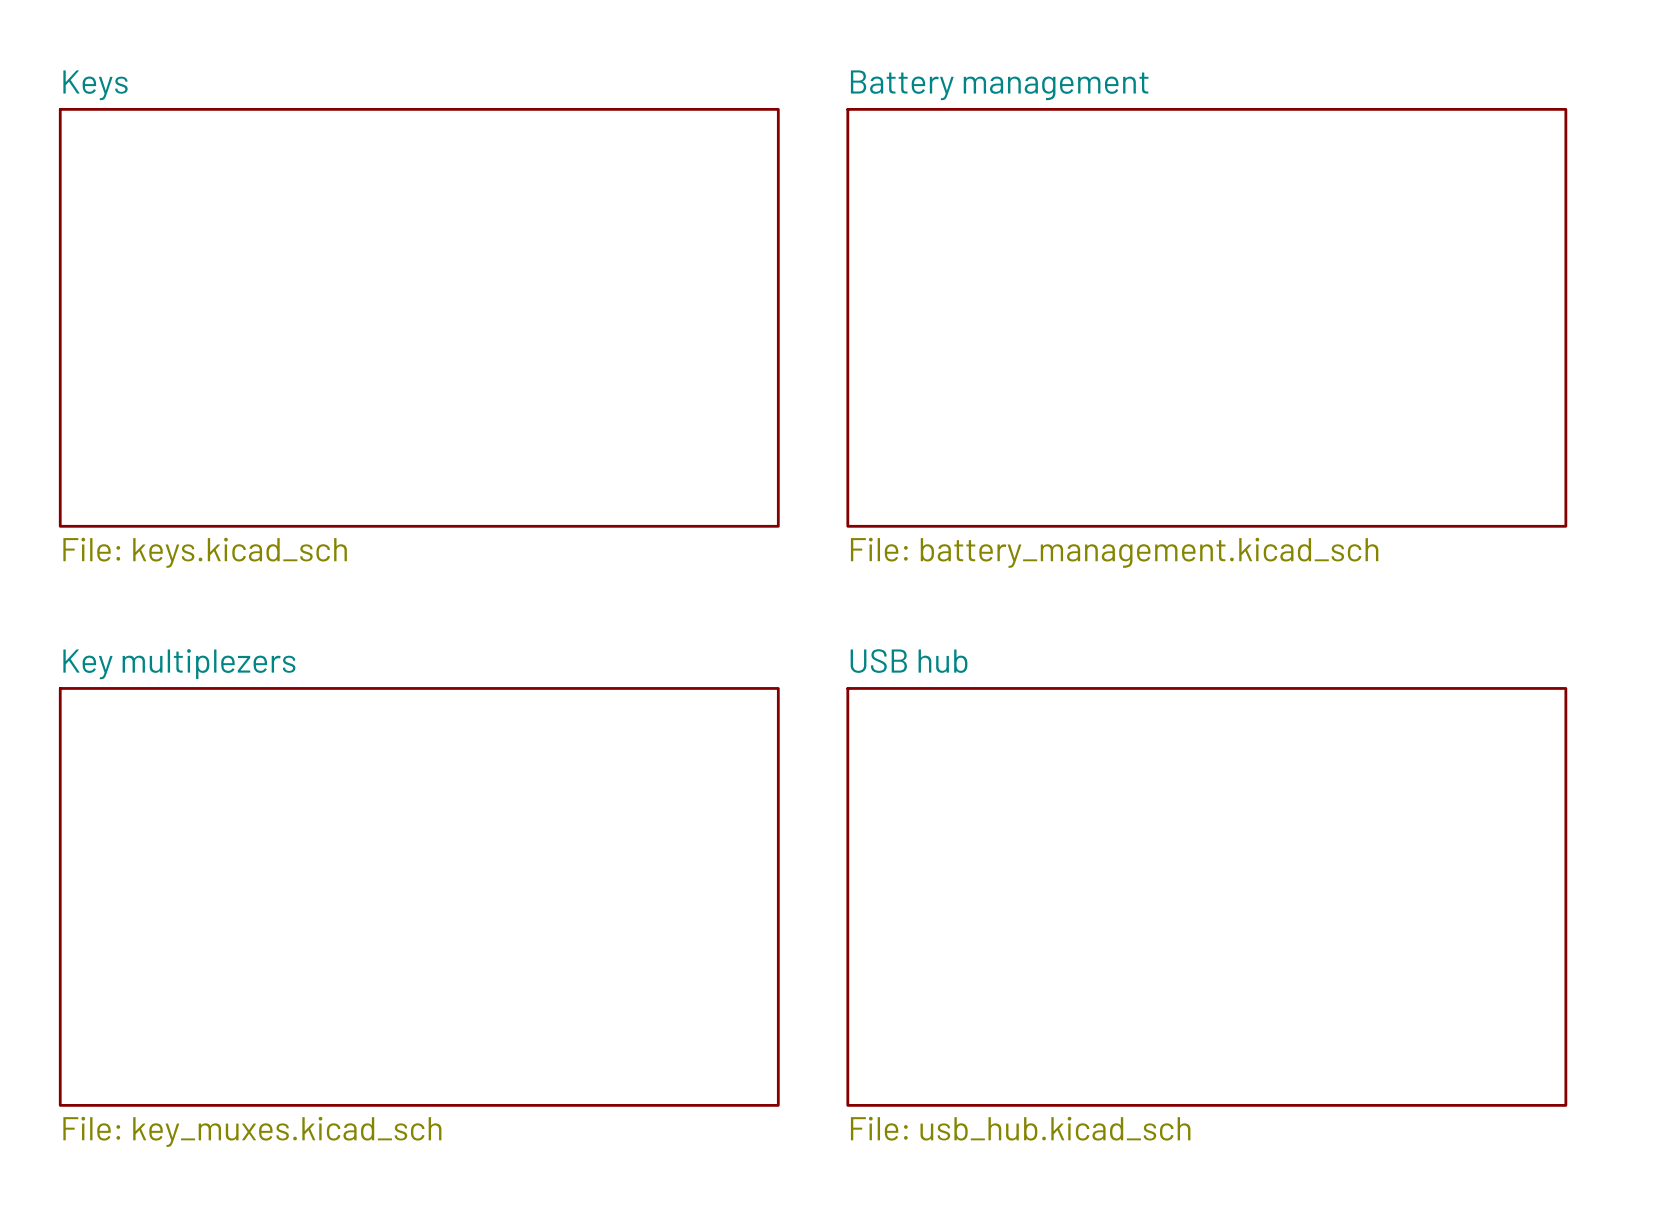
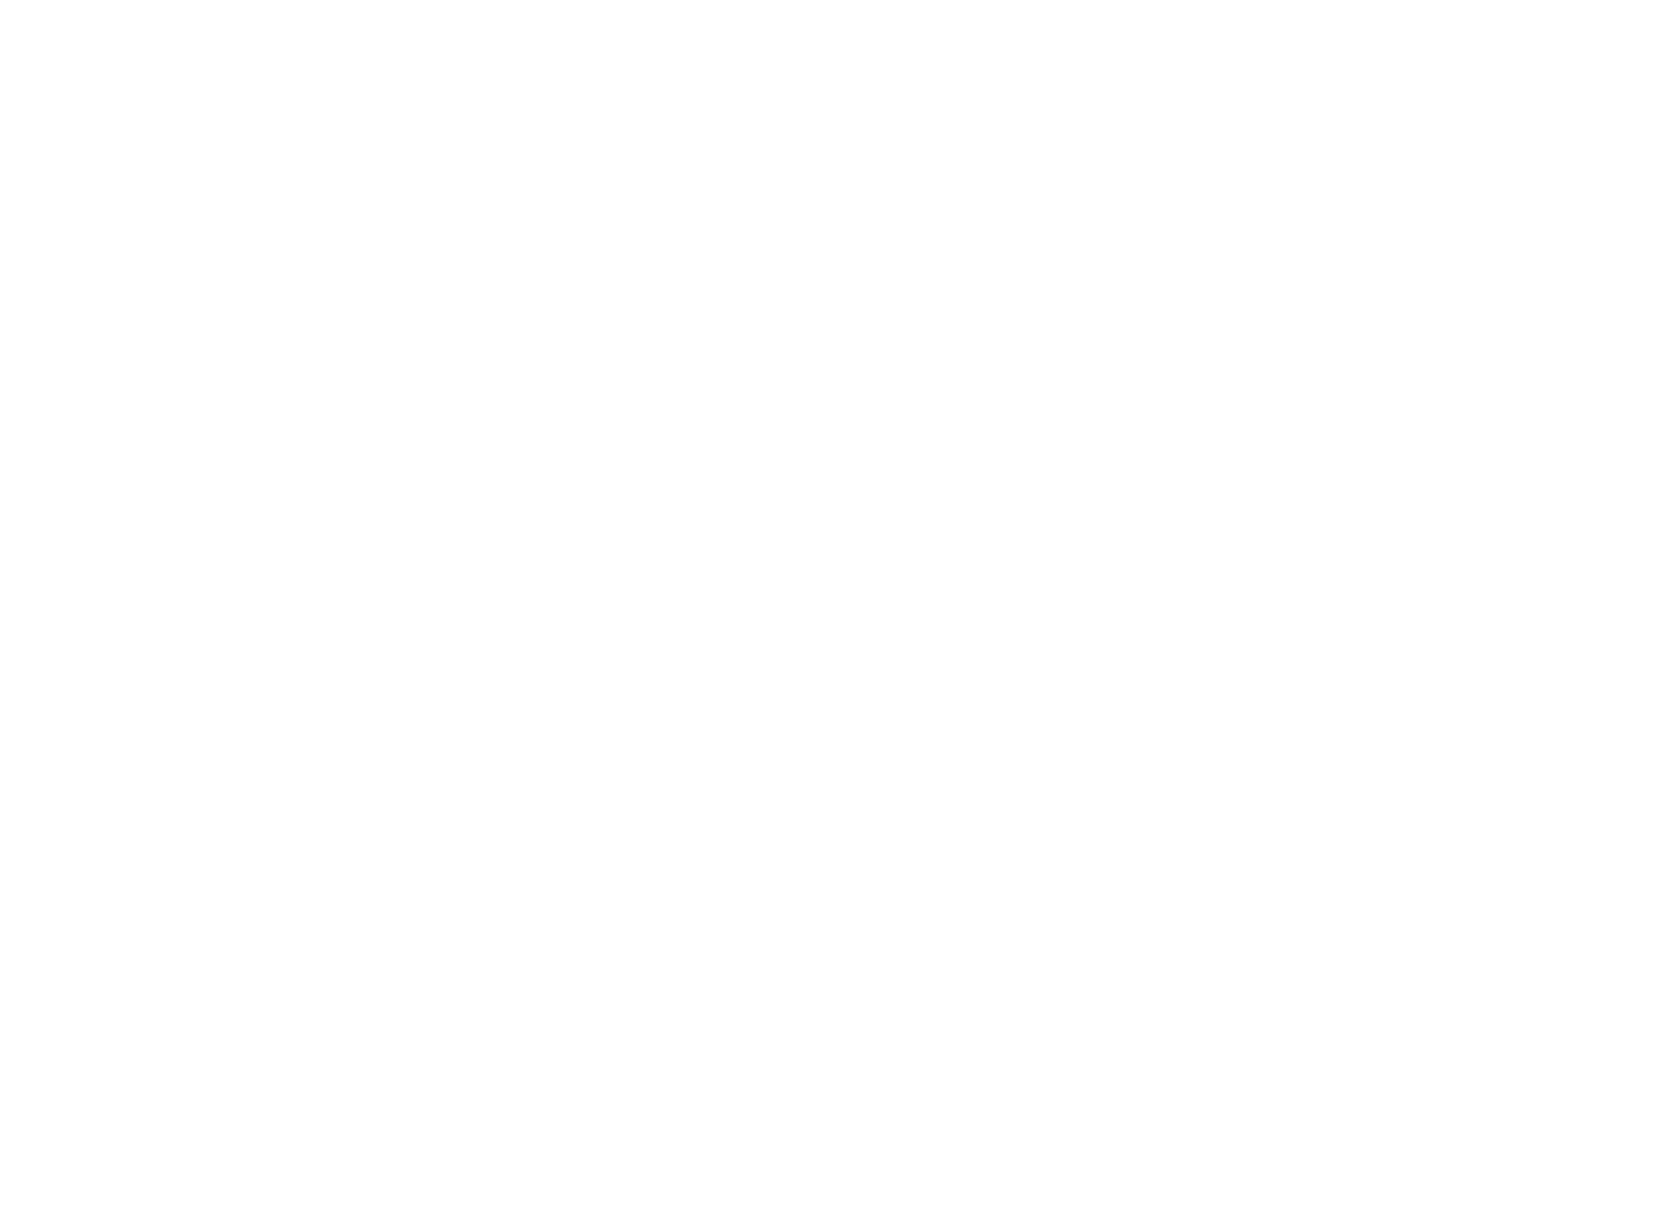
sheet Keys: File: keys.kicad_sch (419, 317) -> none
sheet Battery management: File: battery_management.kicad_sch (1206, 317) -> none
sheet Key multiplezers: File: key_muxes.kicad_sch (419, 896) -> none
sheet USB hub: File: usb_hub.kicad_sch (1206, 896) -> none

